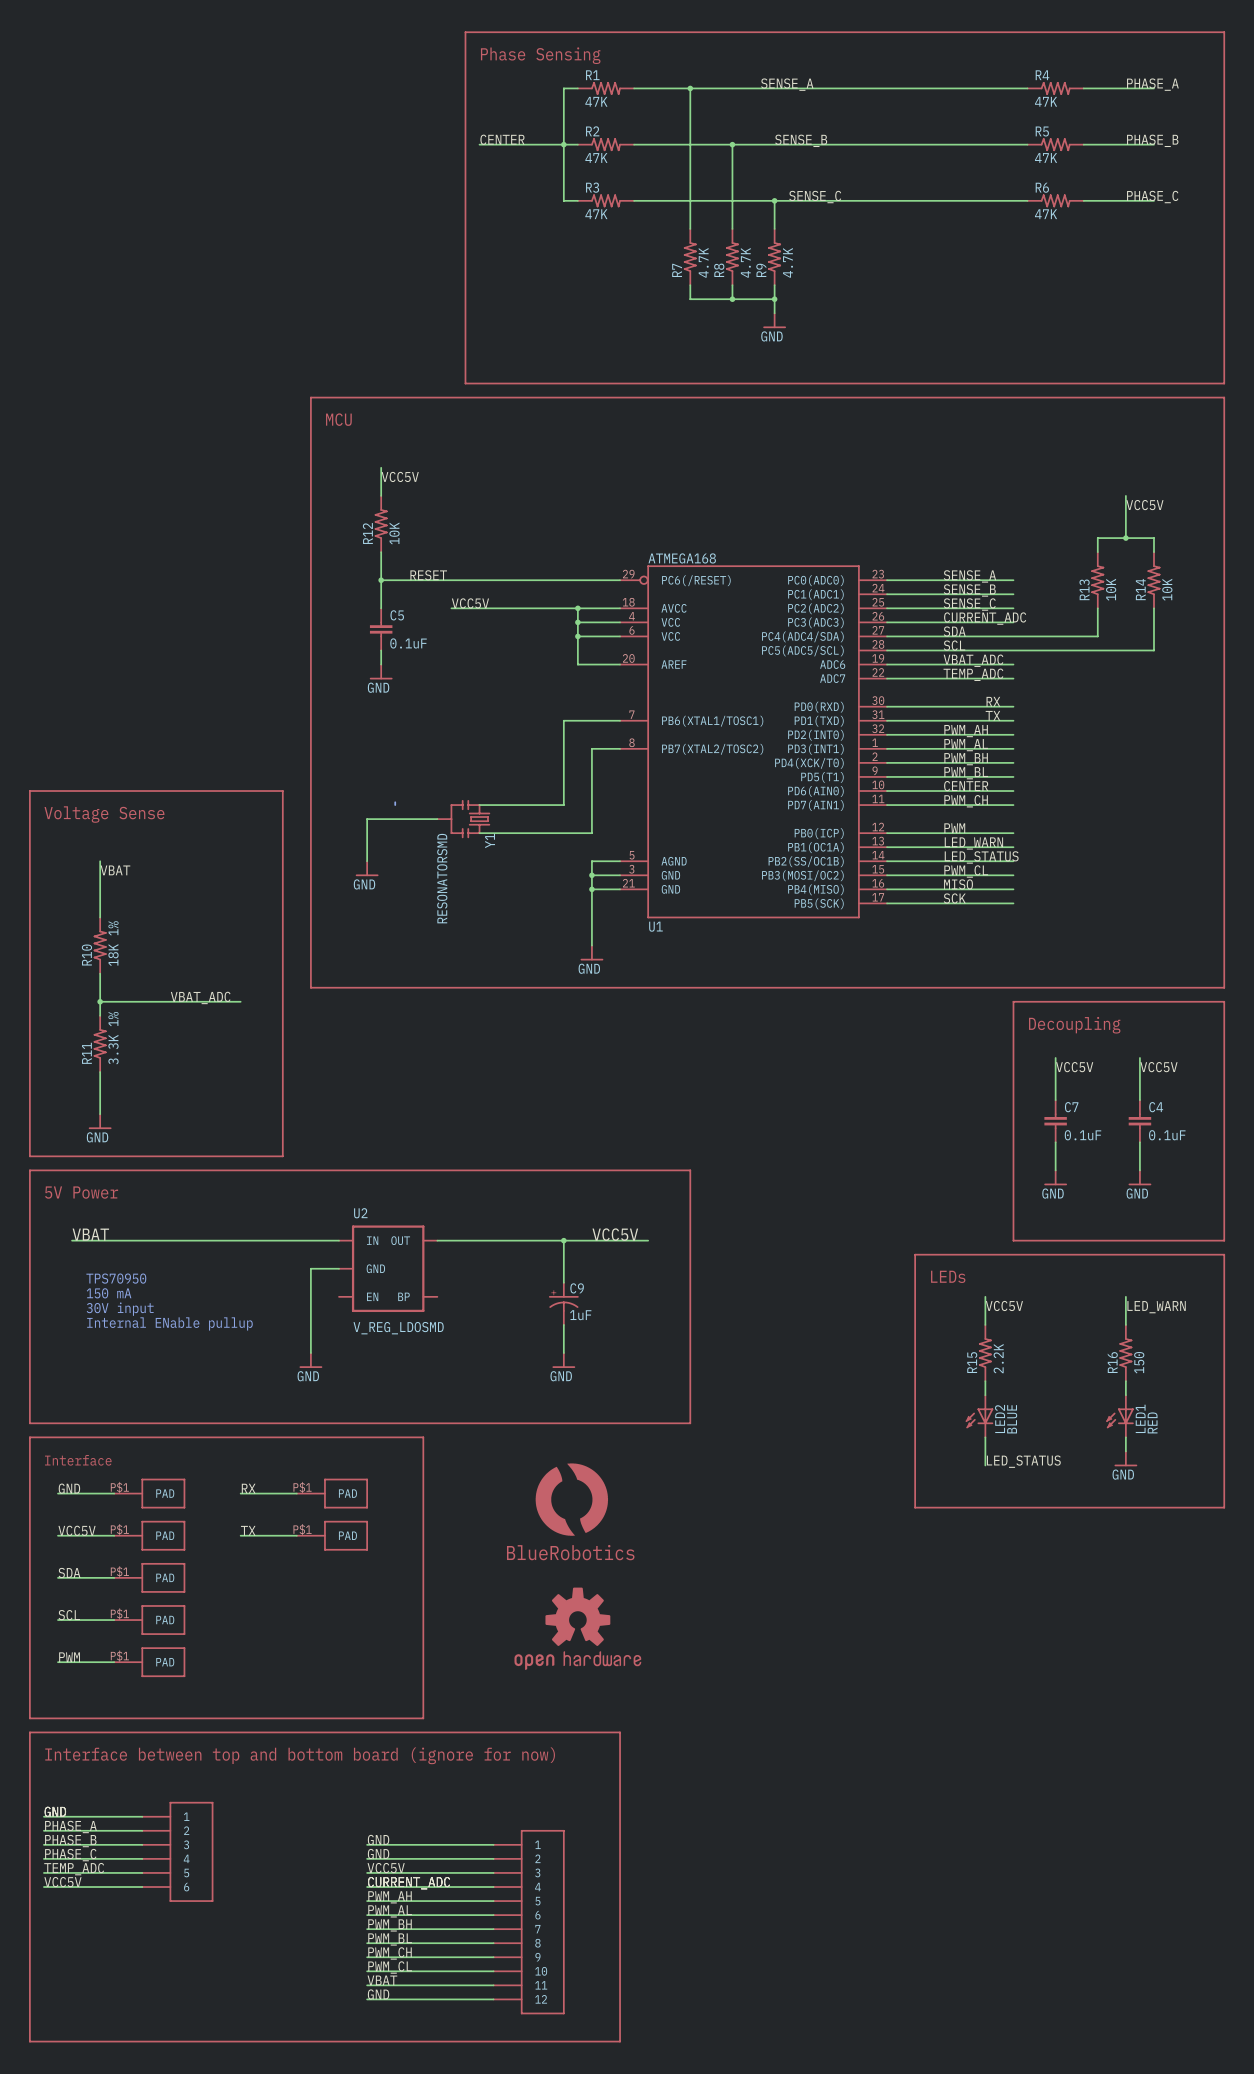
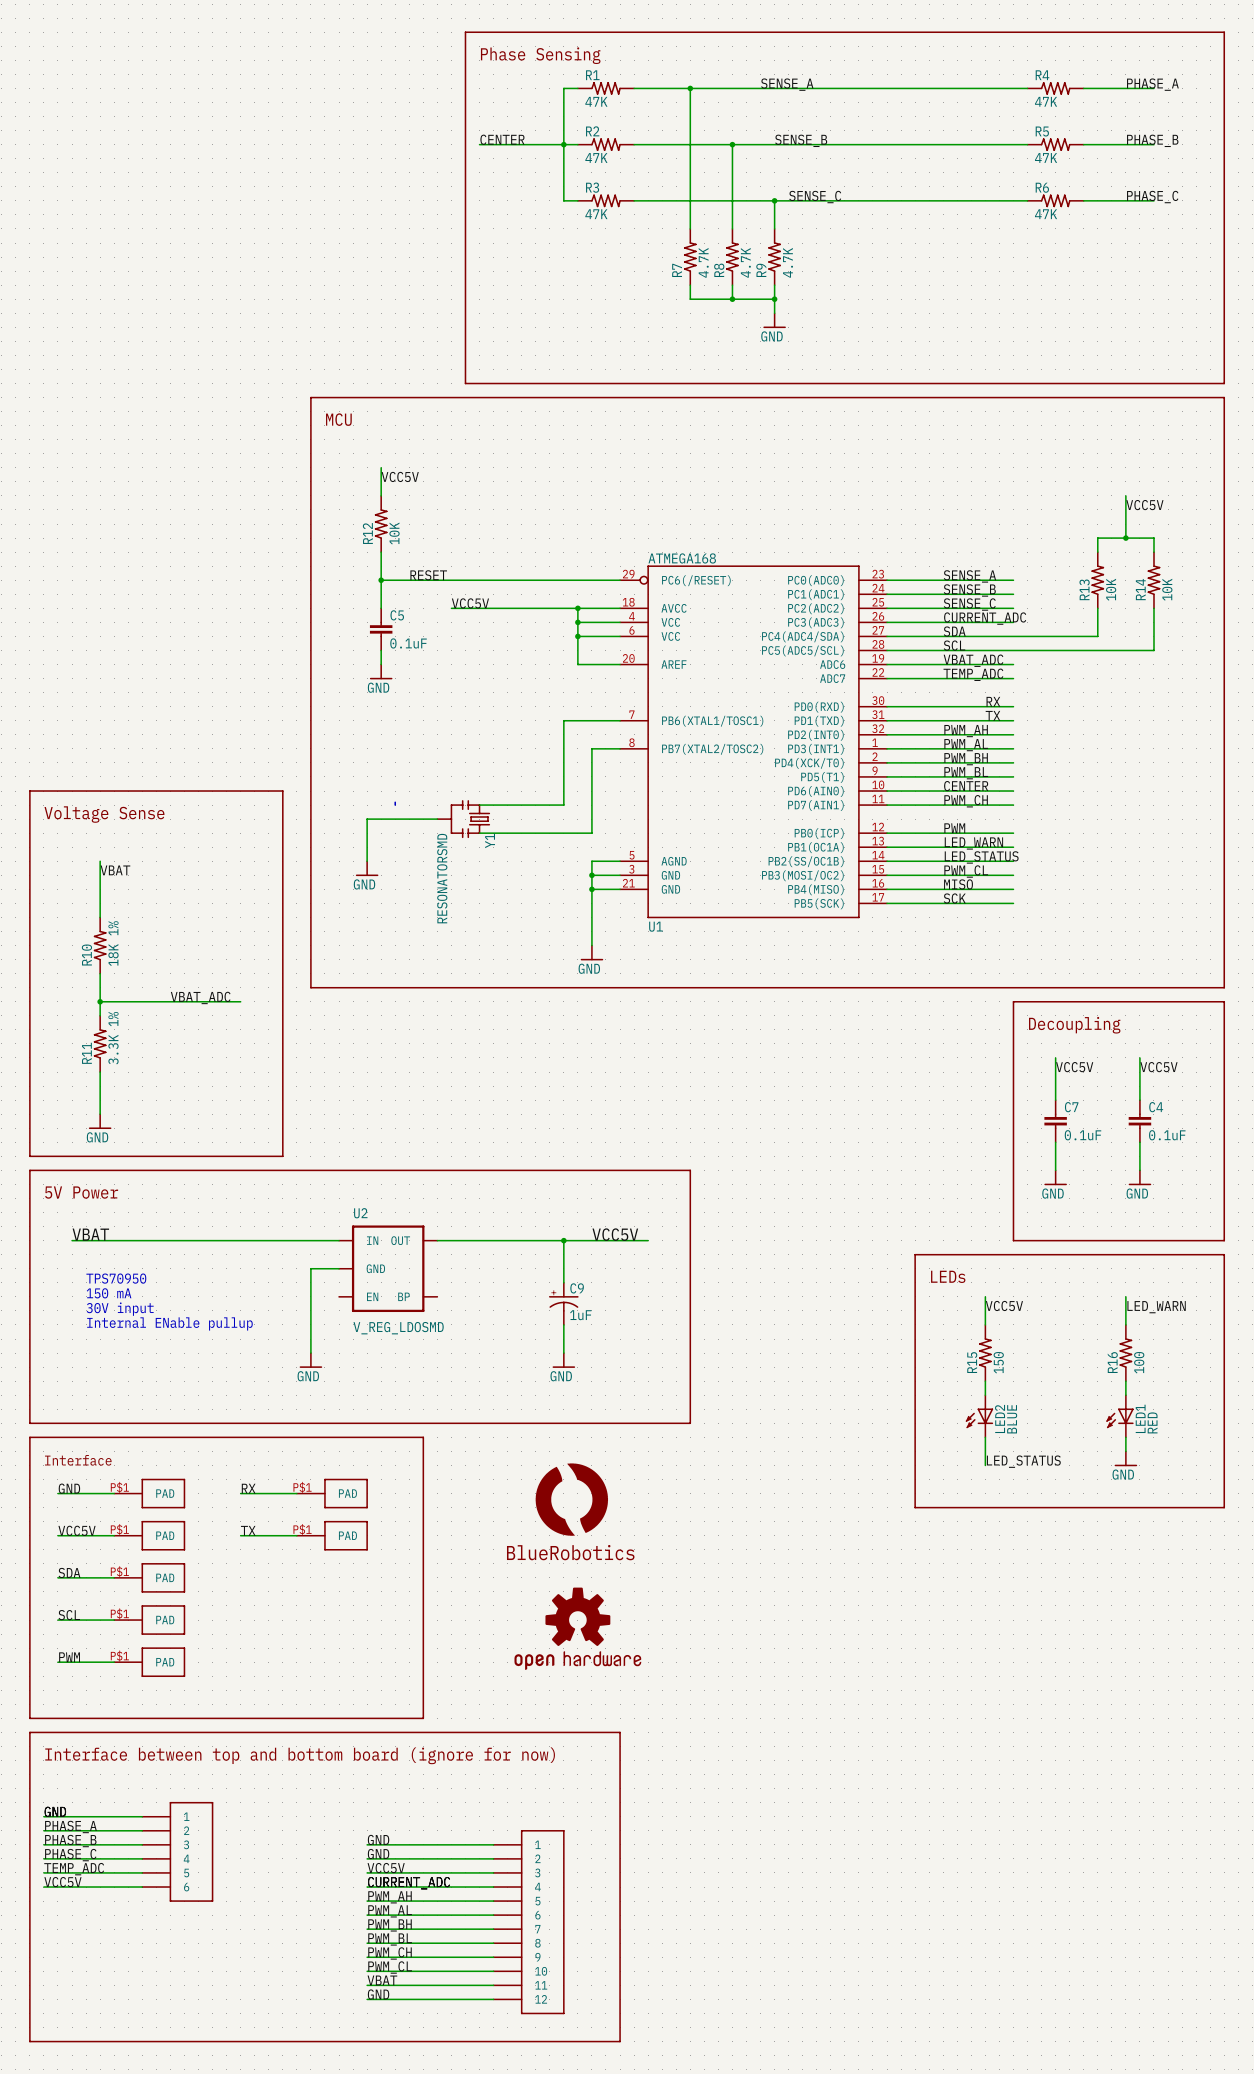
R15 value: 2.2K (998, 1358) -> 150 (998, 1362)
R16 value: 150 (1139, 1362) -> 100 (1139, 1362)

